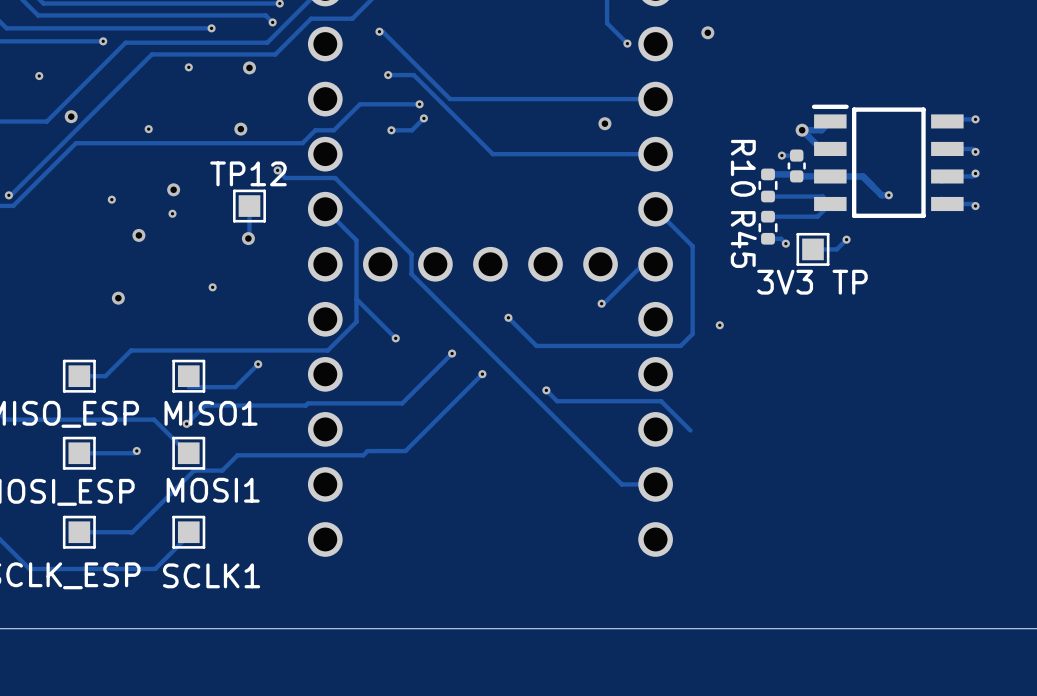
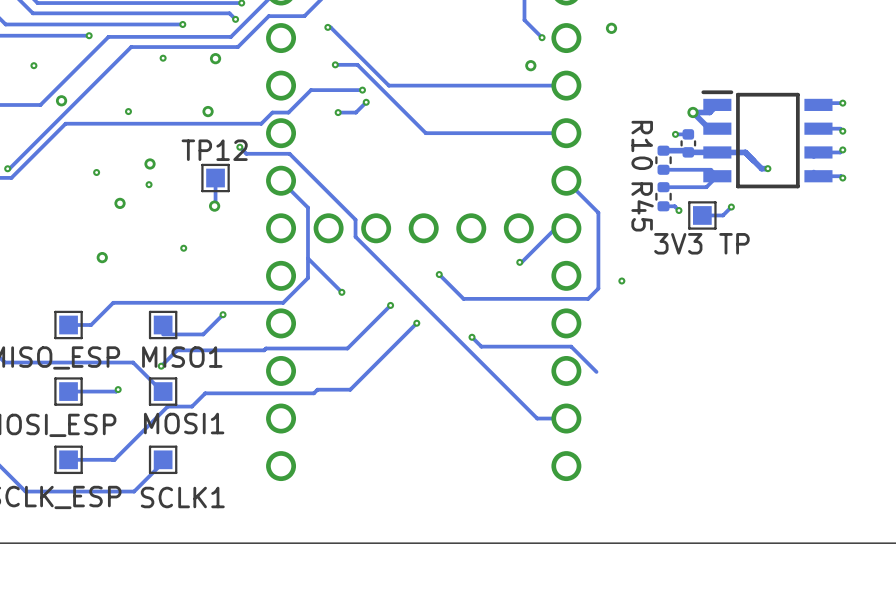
via position: (604, 123) -> (530, 65)

